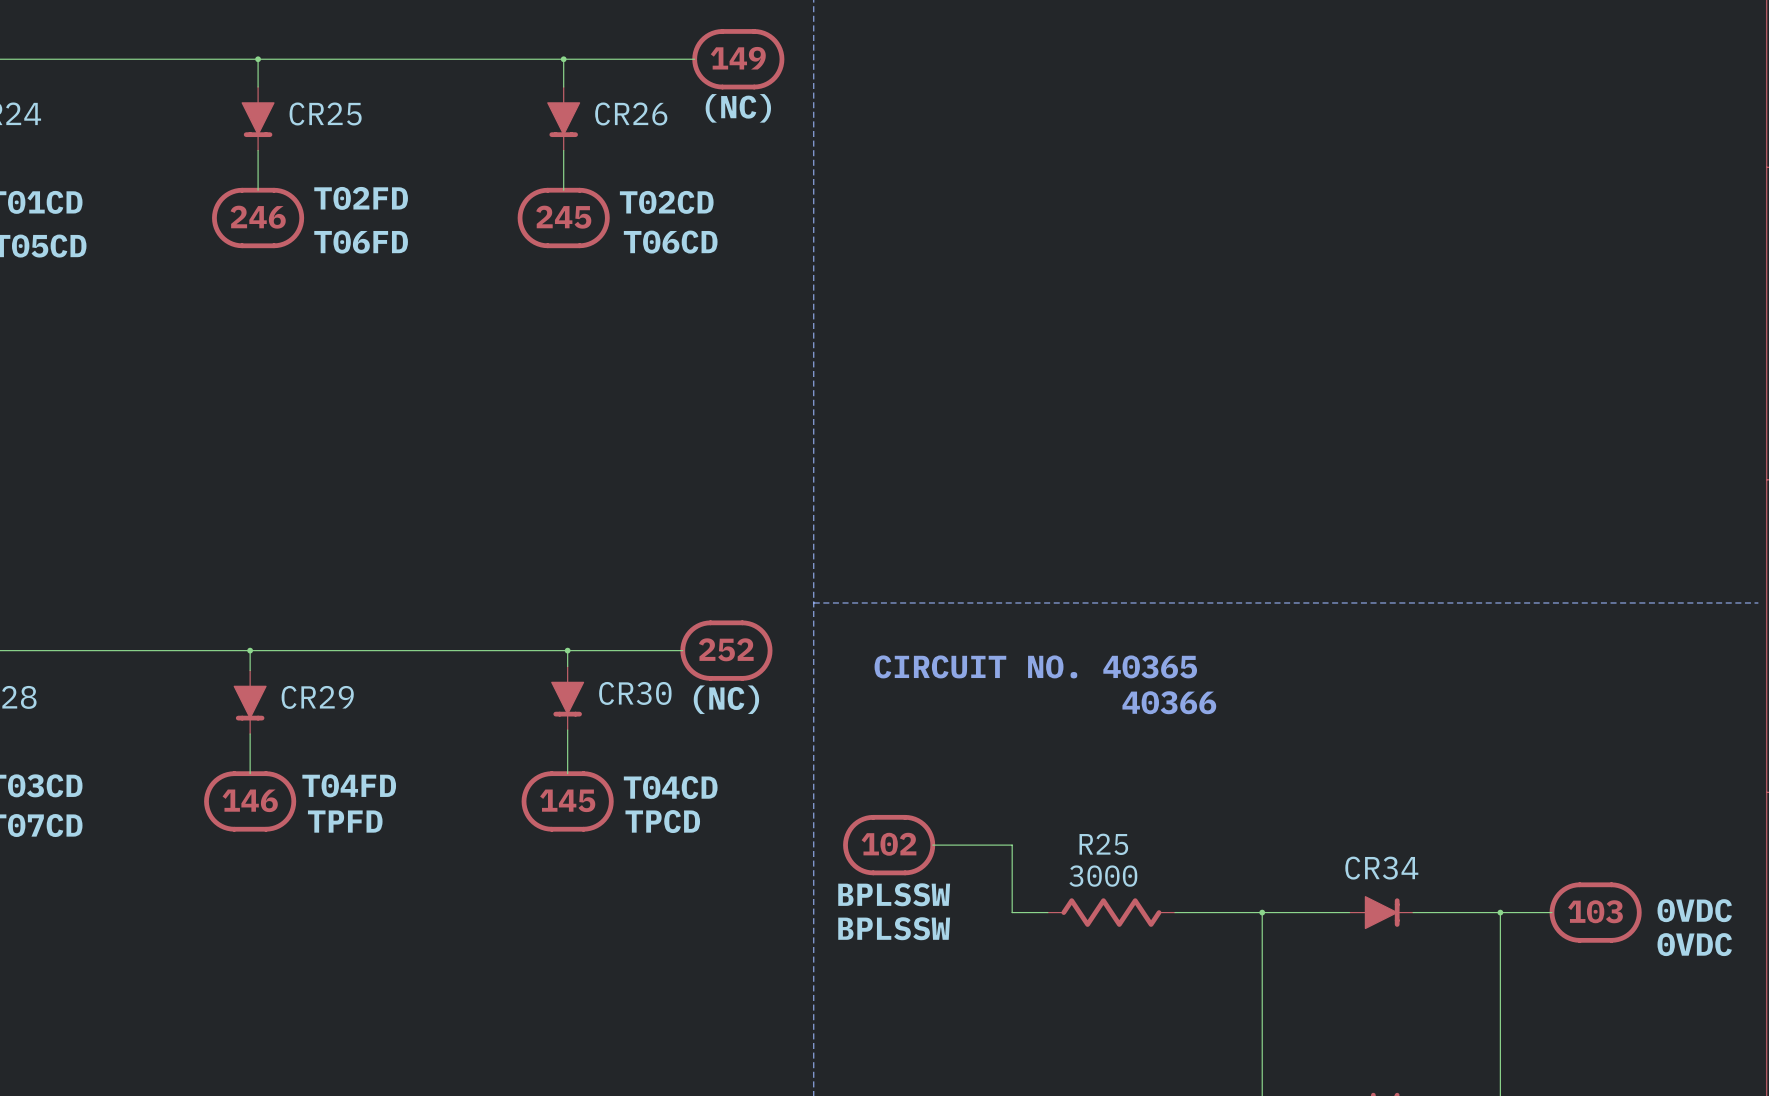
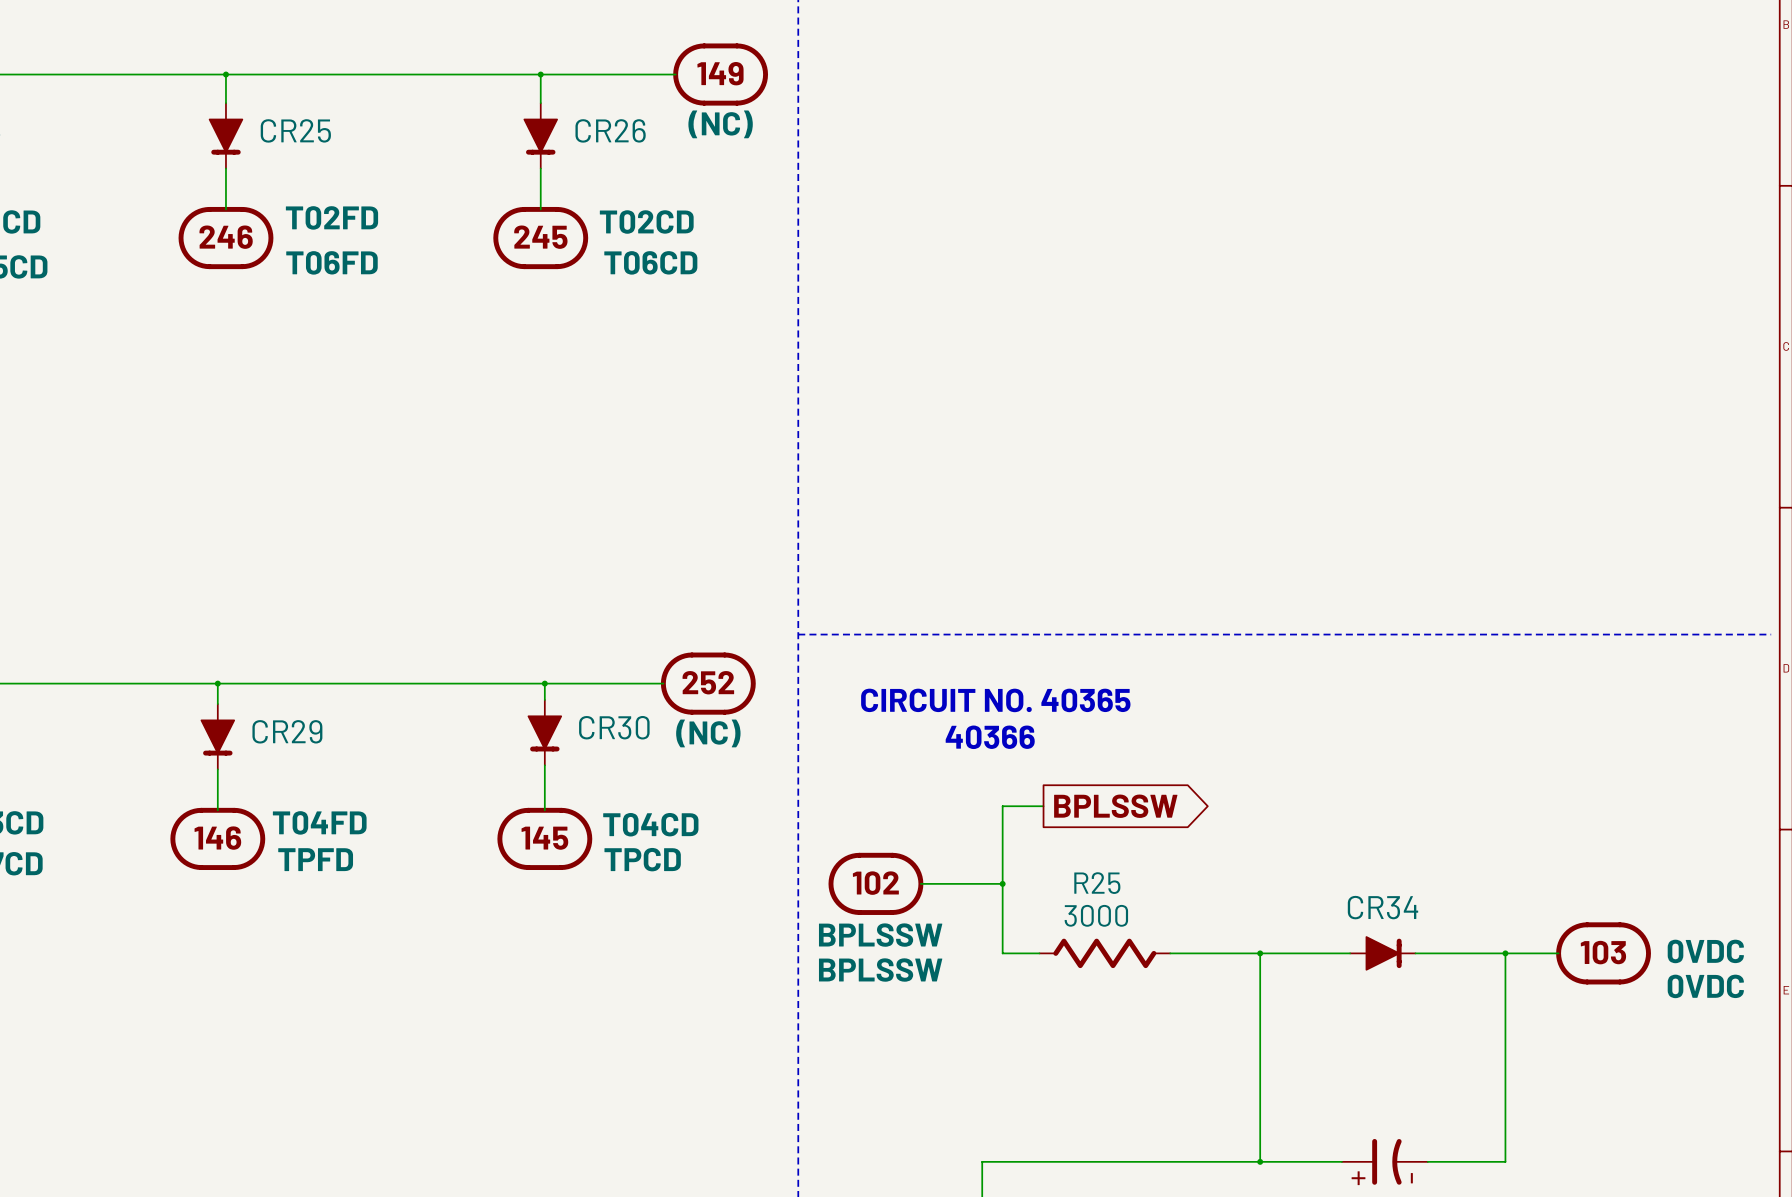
wire: none -> (1043, 806) (1002, 806) (1002, 883)
global label: none -> BPLSSW (1115, 806)
junction: none -> (1002, 883)

